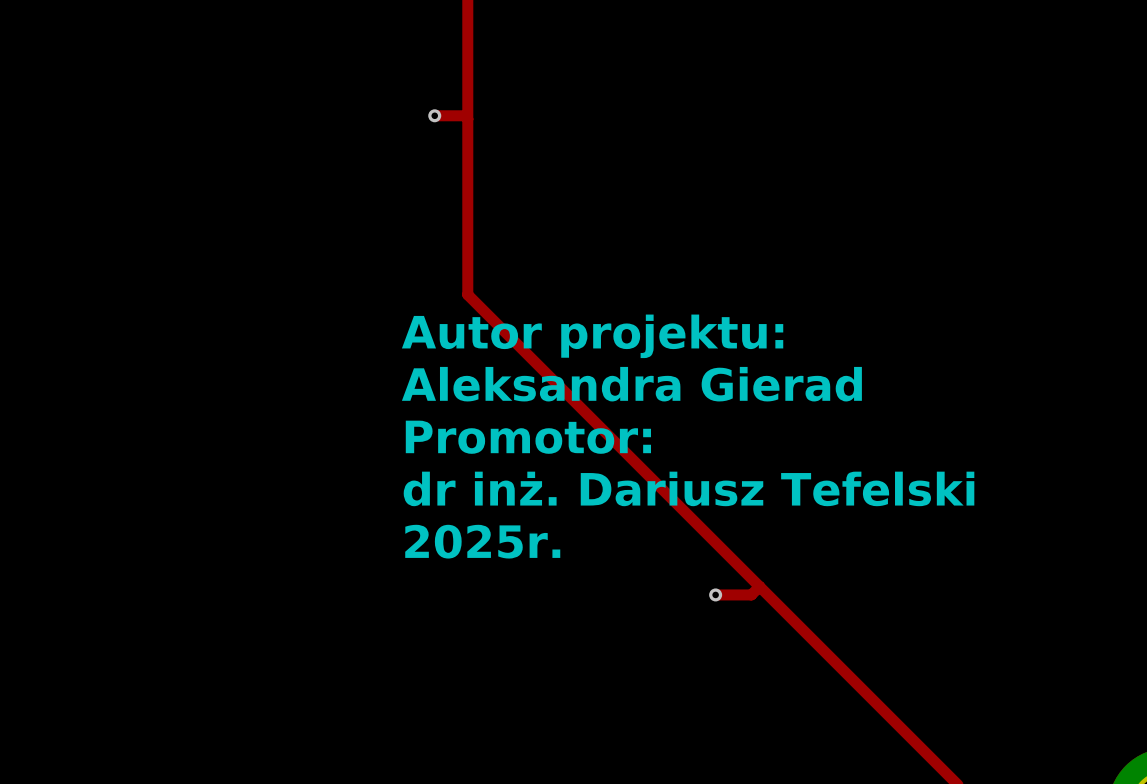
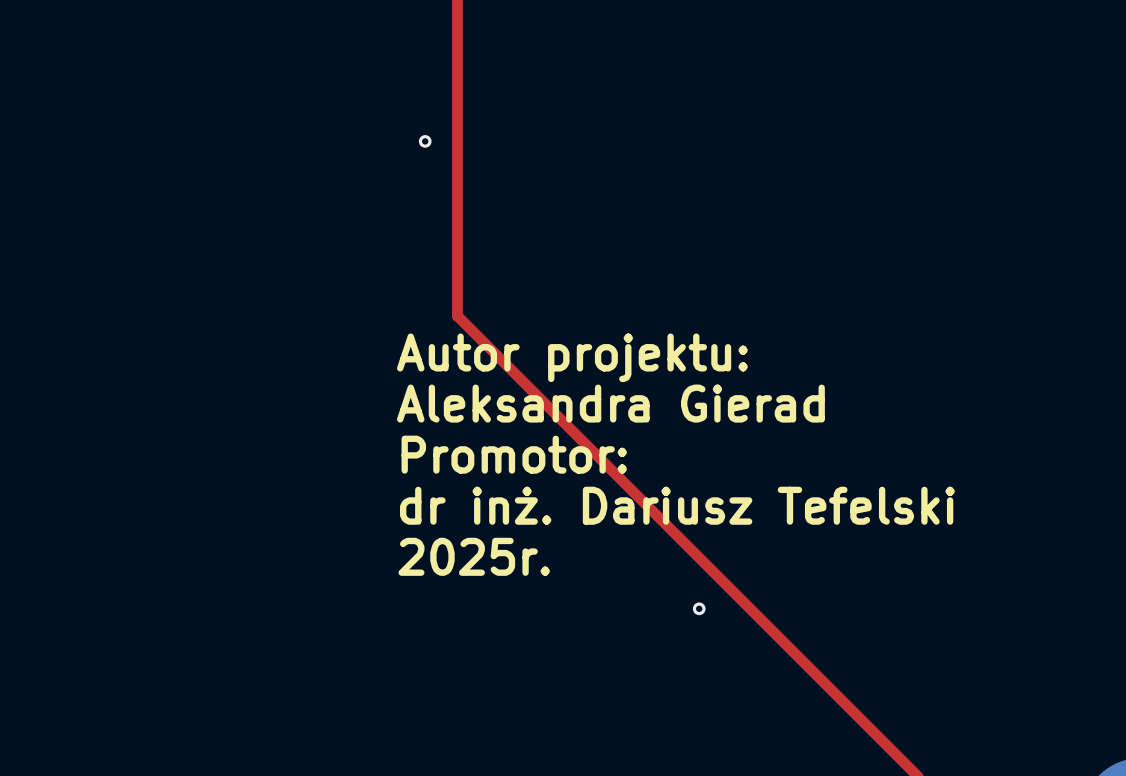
top track: (434, 115) (464, 115) (467, 119) -> none
top track: (759, 586) (751, 594) (715, 594) -> none

